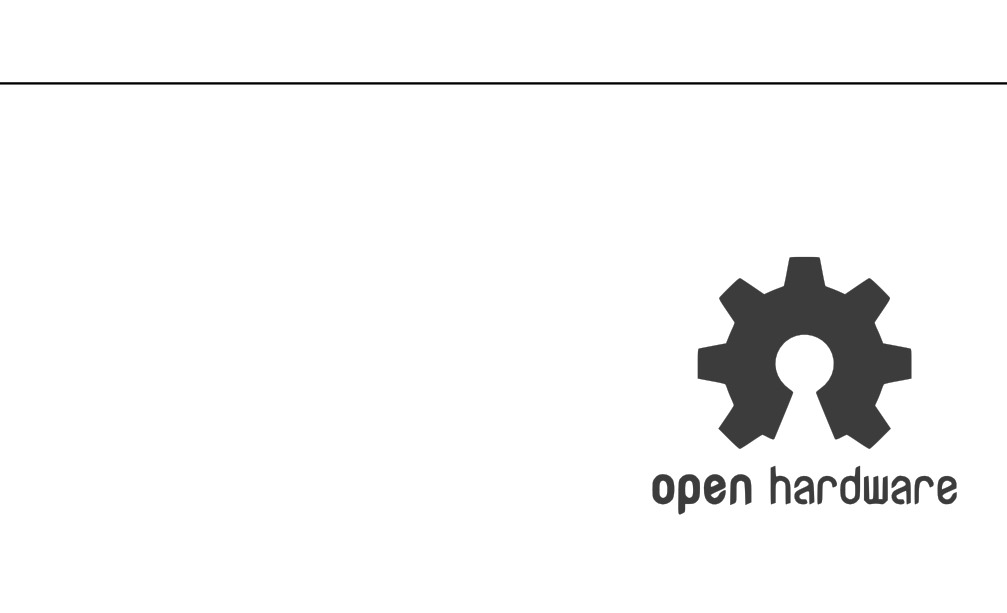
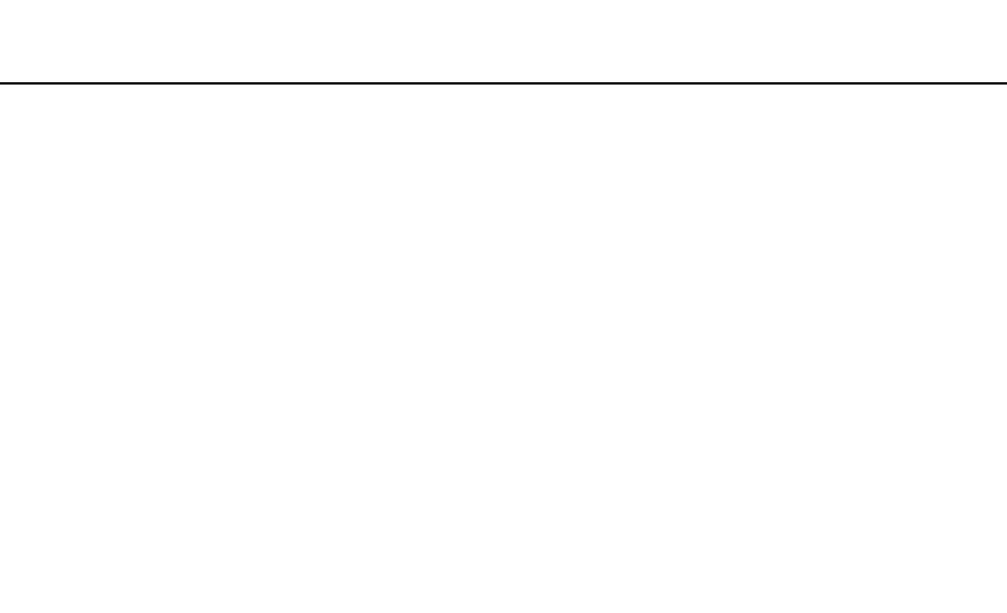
drawing: [652, 256, 957, 515] -> none

